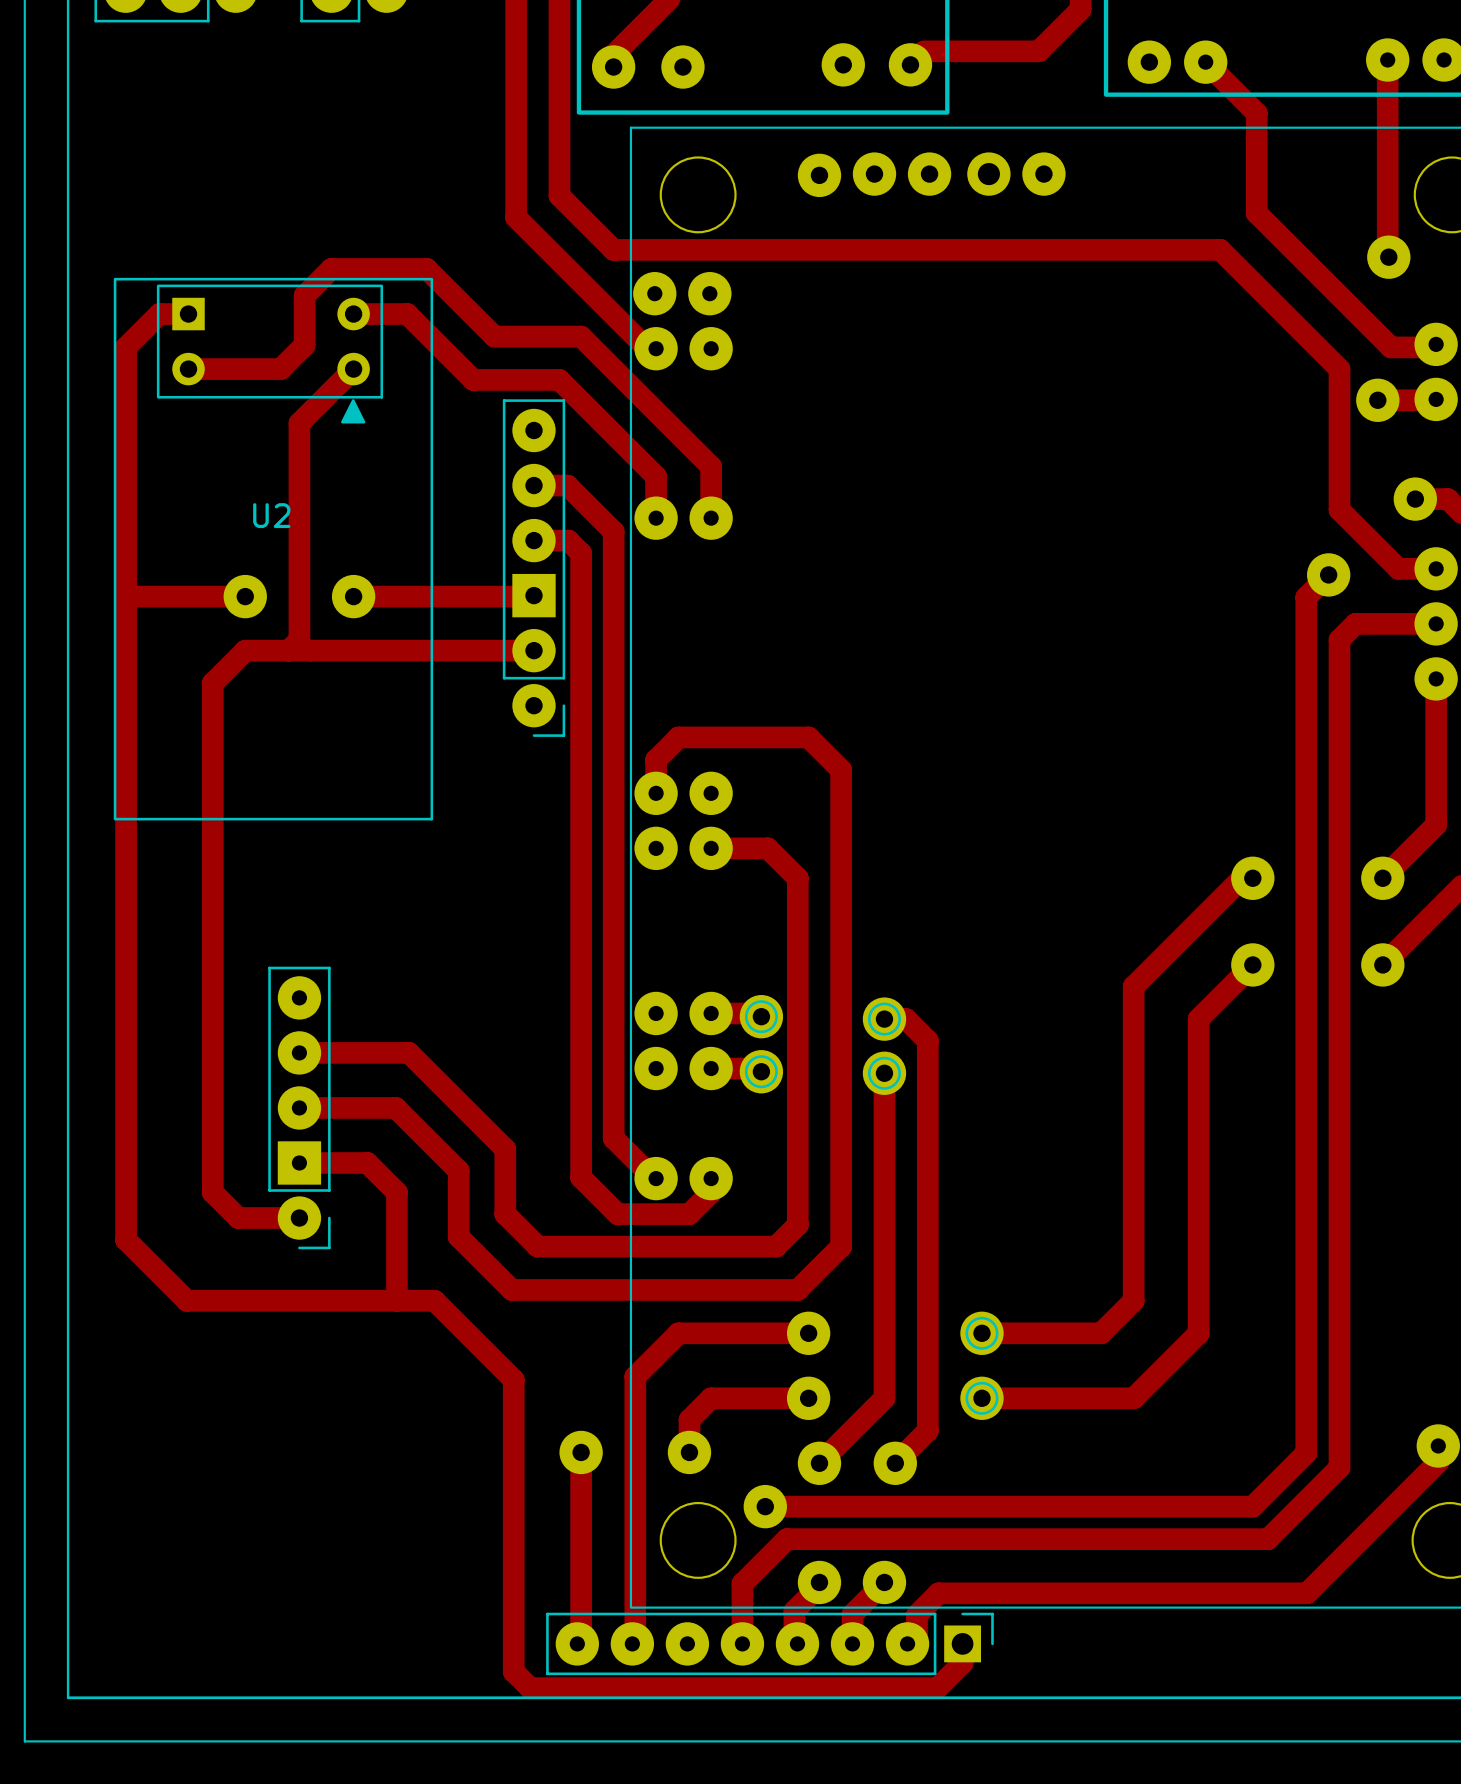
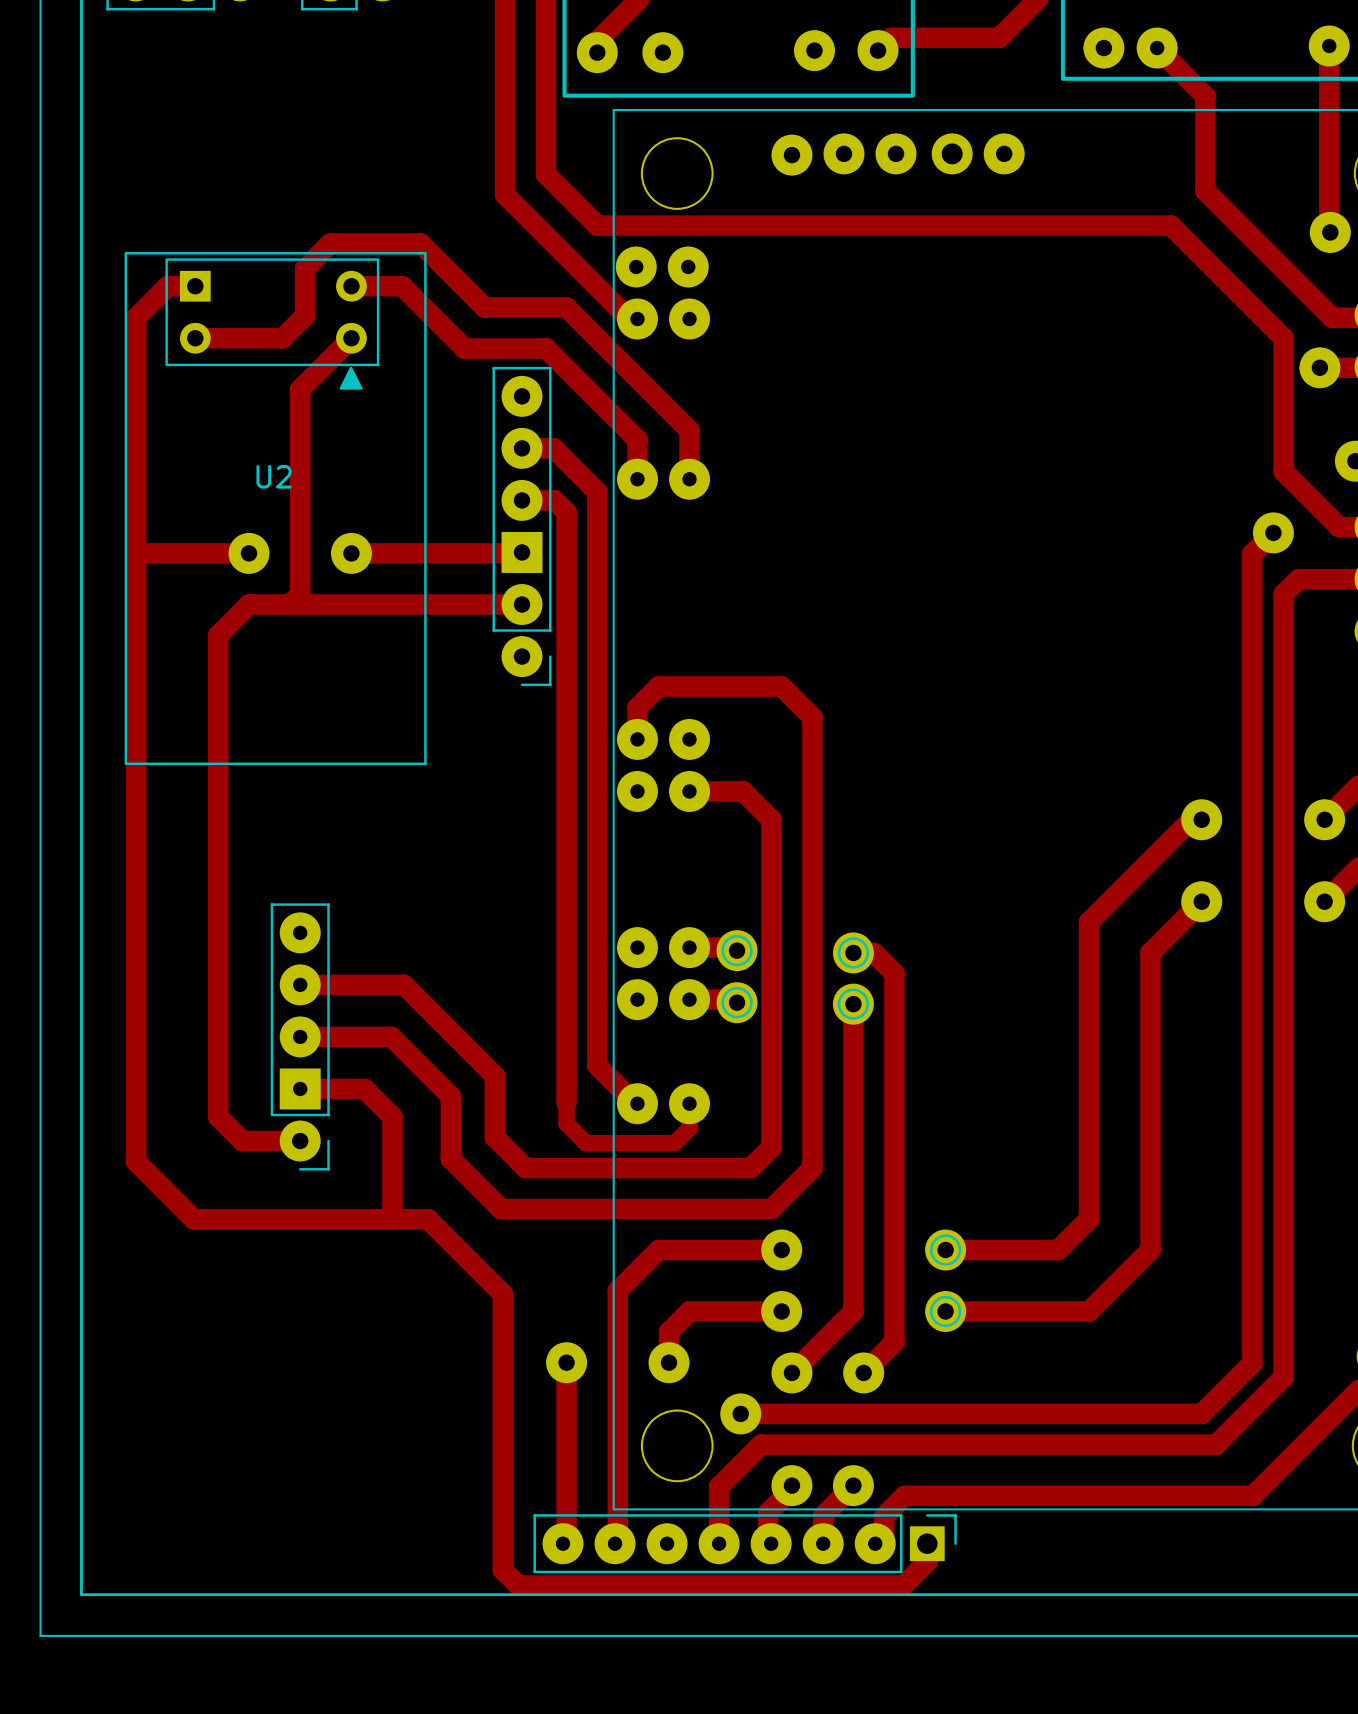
track: (581, 1177) (617, 1214) (689, 1214) (711, 1192) -> (566, 1102) (566, 1123) (586, 1143) (674, 1143) (689, 1128) (689, 1116)

